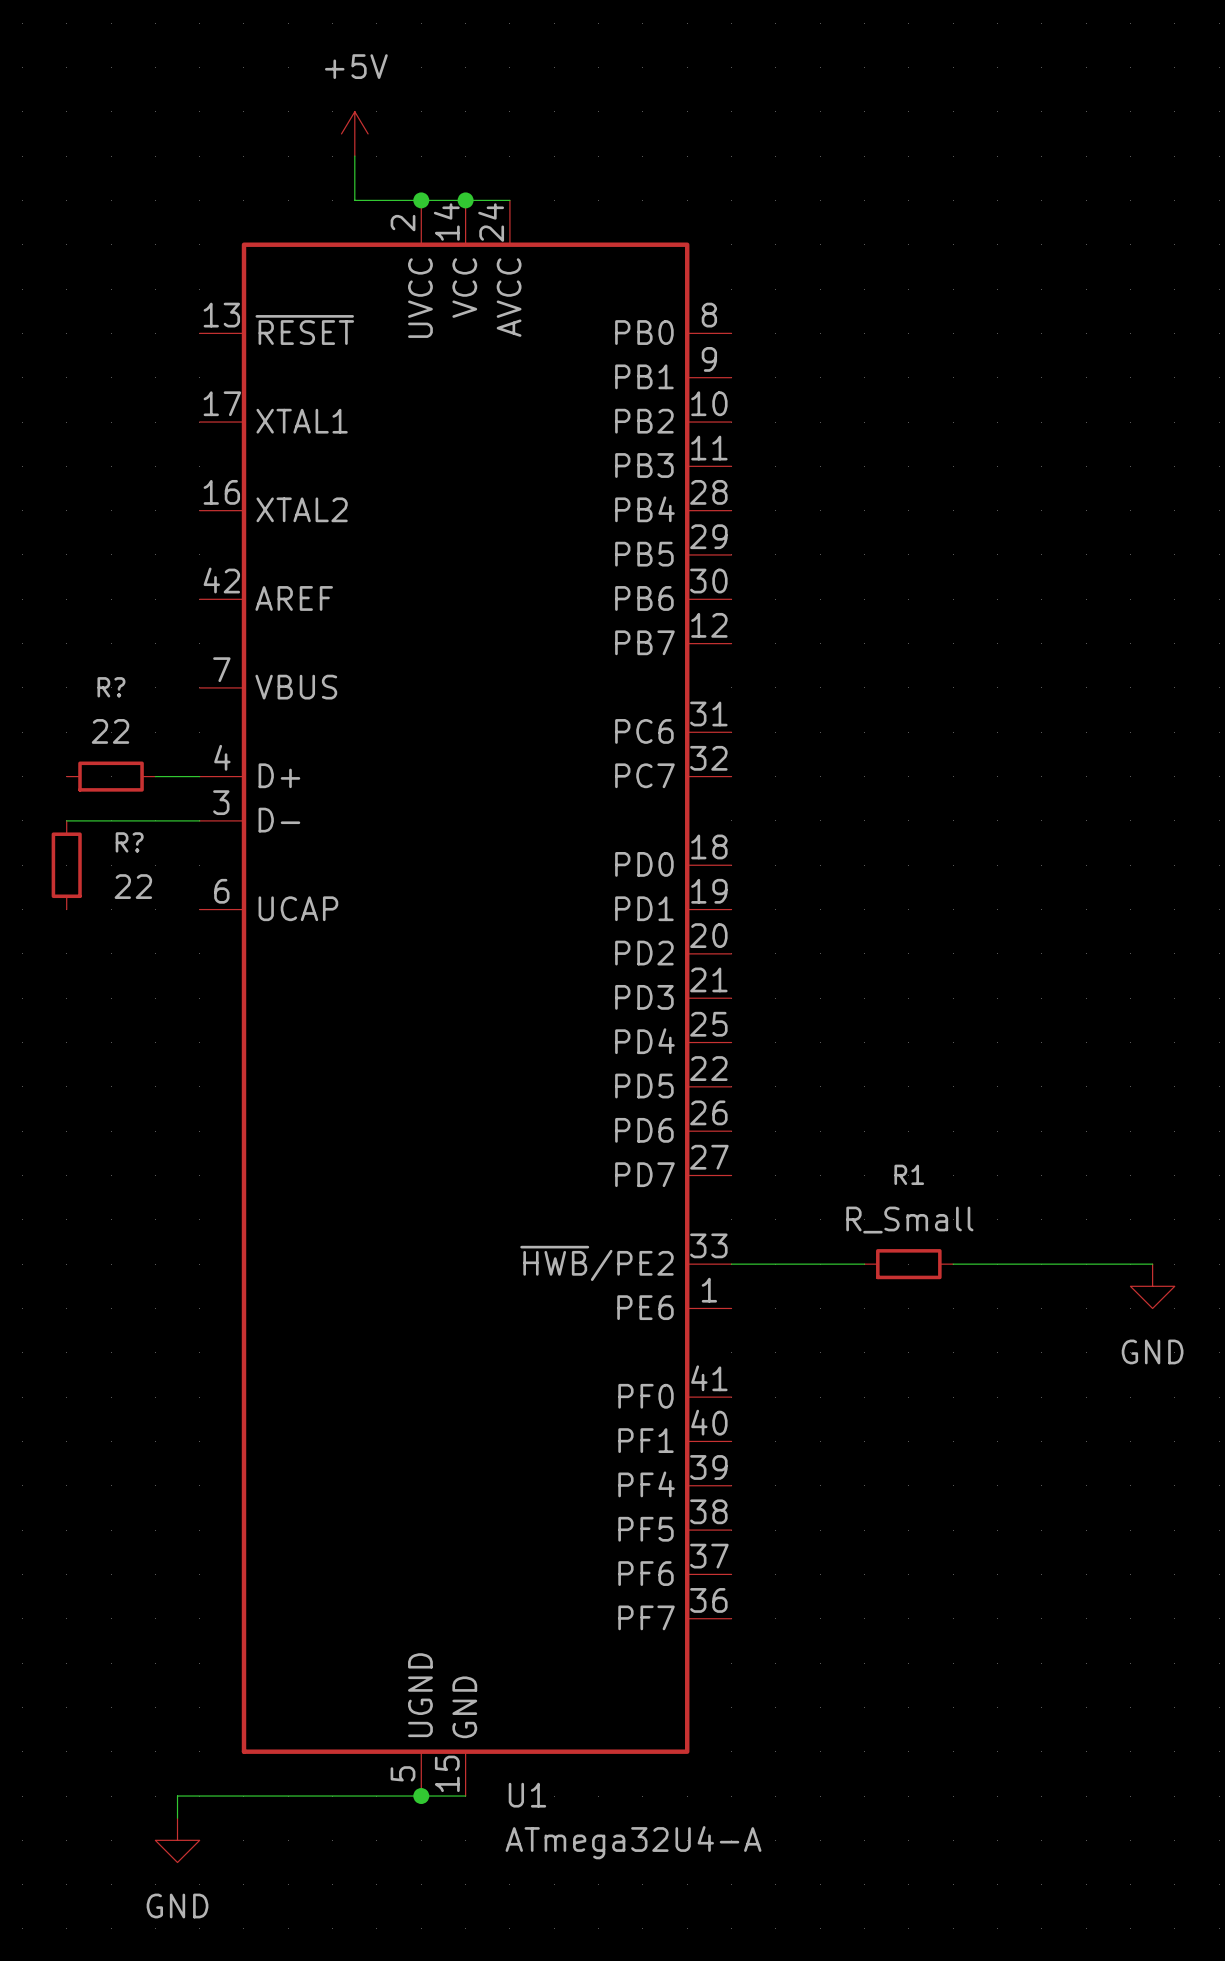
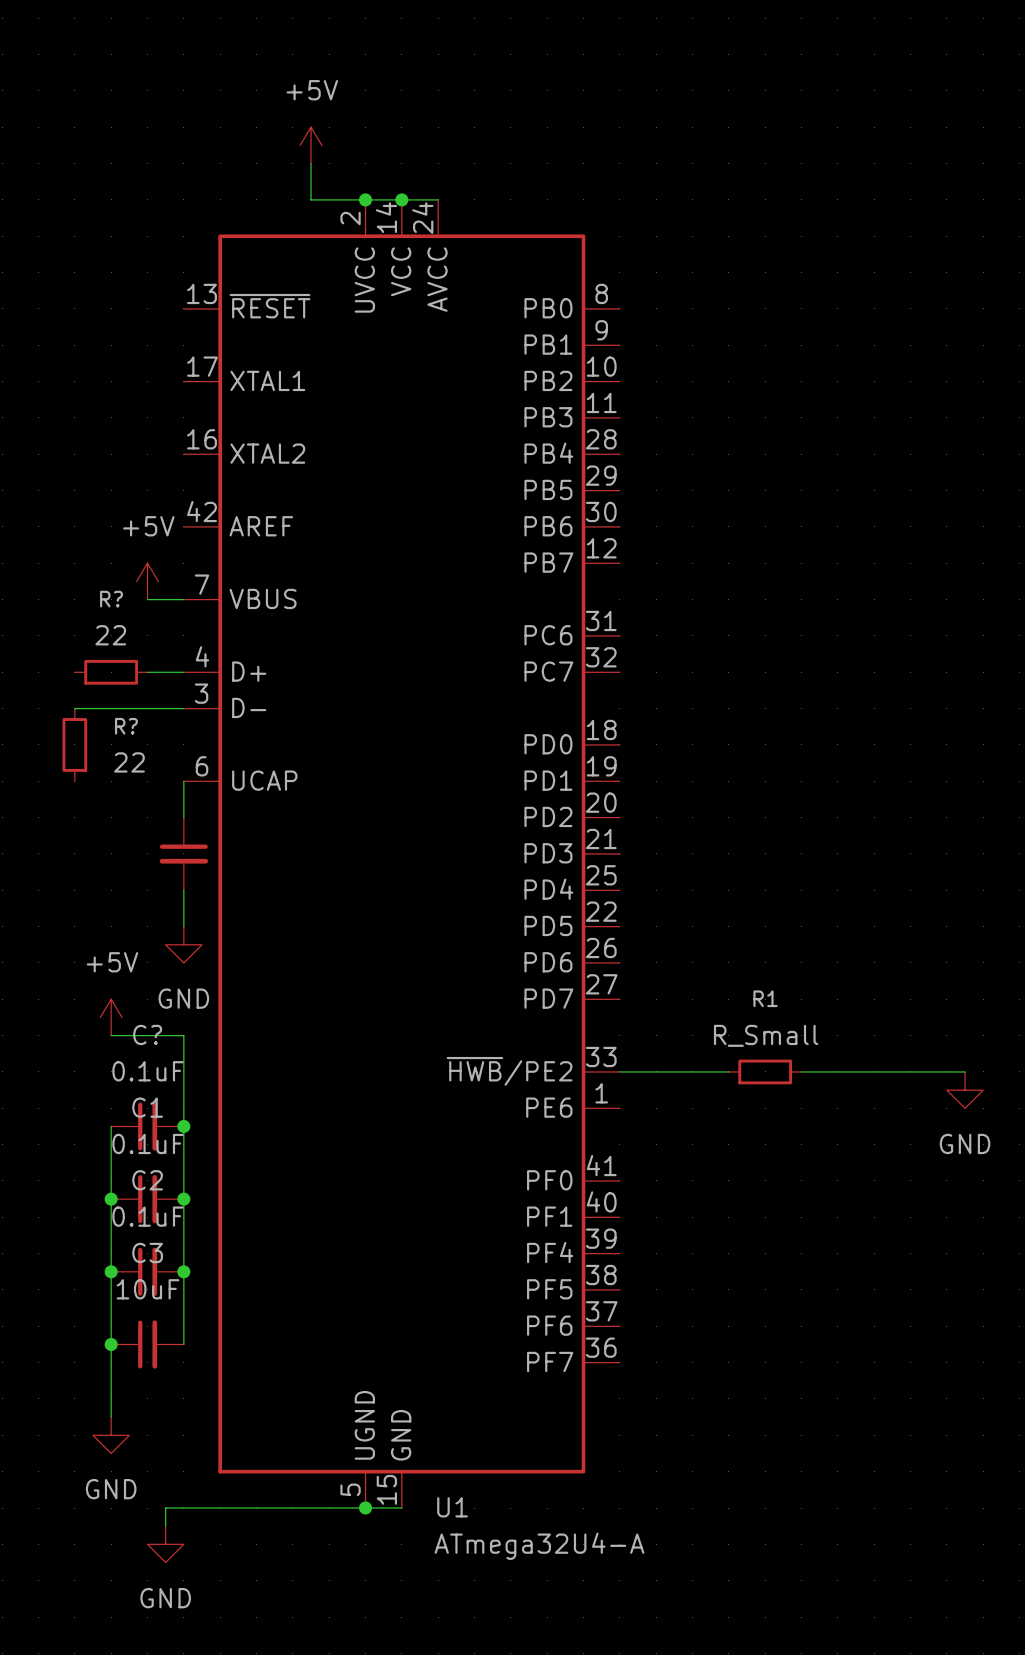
power symbol: none -> +5V (147, 581)
wire: none -> (147, 599) (183, 599)
wire: none -> (183, 781) (183, 817)
part: none -> (183, 853)
wire: none -> (183, 890) (183, 926)
power symbol: none -> GND (183, 944)
power symbol: none -> +5V (111, 1017)
wire: none -> (111, 1035) (183, 1035) (183, 1344)
wire: none -> (111, 1126) (111, 1417)
C?: none -> 0.1uF (147, 1126)
junction: none -> (183, 1126)
junction: none -> (111, 1199)
C1: none -> 0.1uF (147, 1199)
junction: none -> (183, 1199)
junction: none -> (111, 1271)
C2: none -> 0.1uF (147, 1271)
junction: none -> (183, 1271)
junction: none -> (111, 1344)
C3: none -> 10uF (147, 1344)
power symbol: none -> GND (111, 1435)

